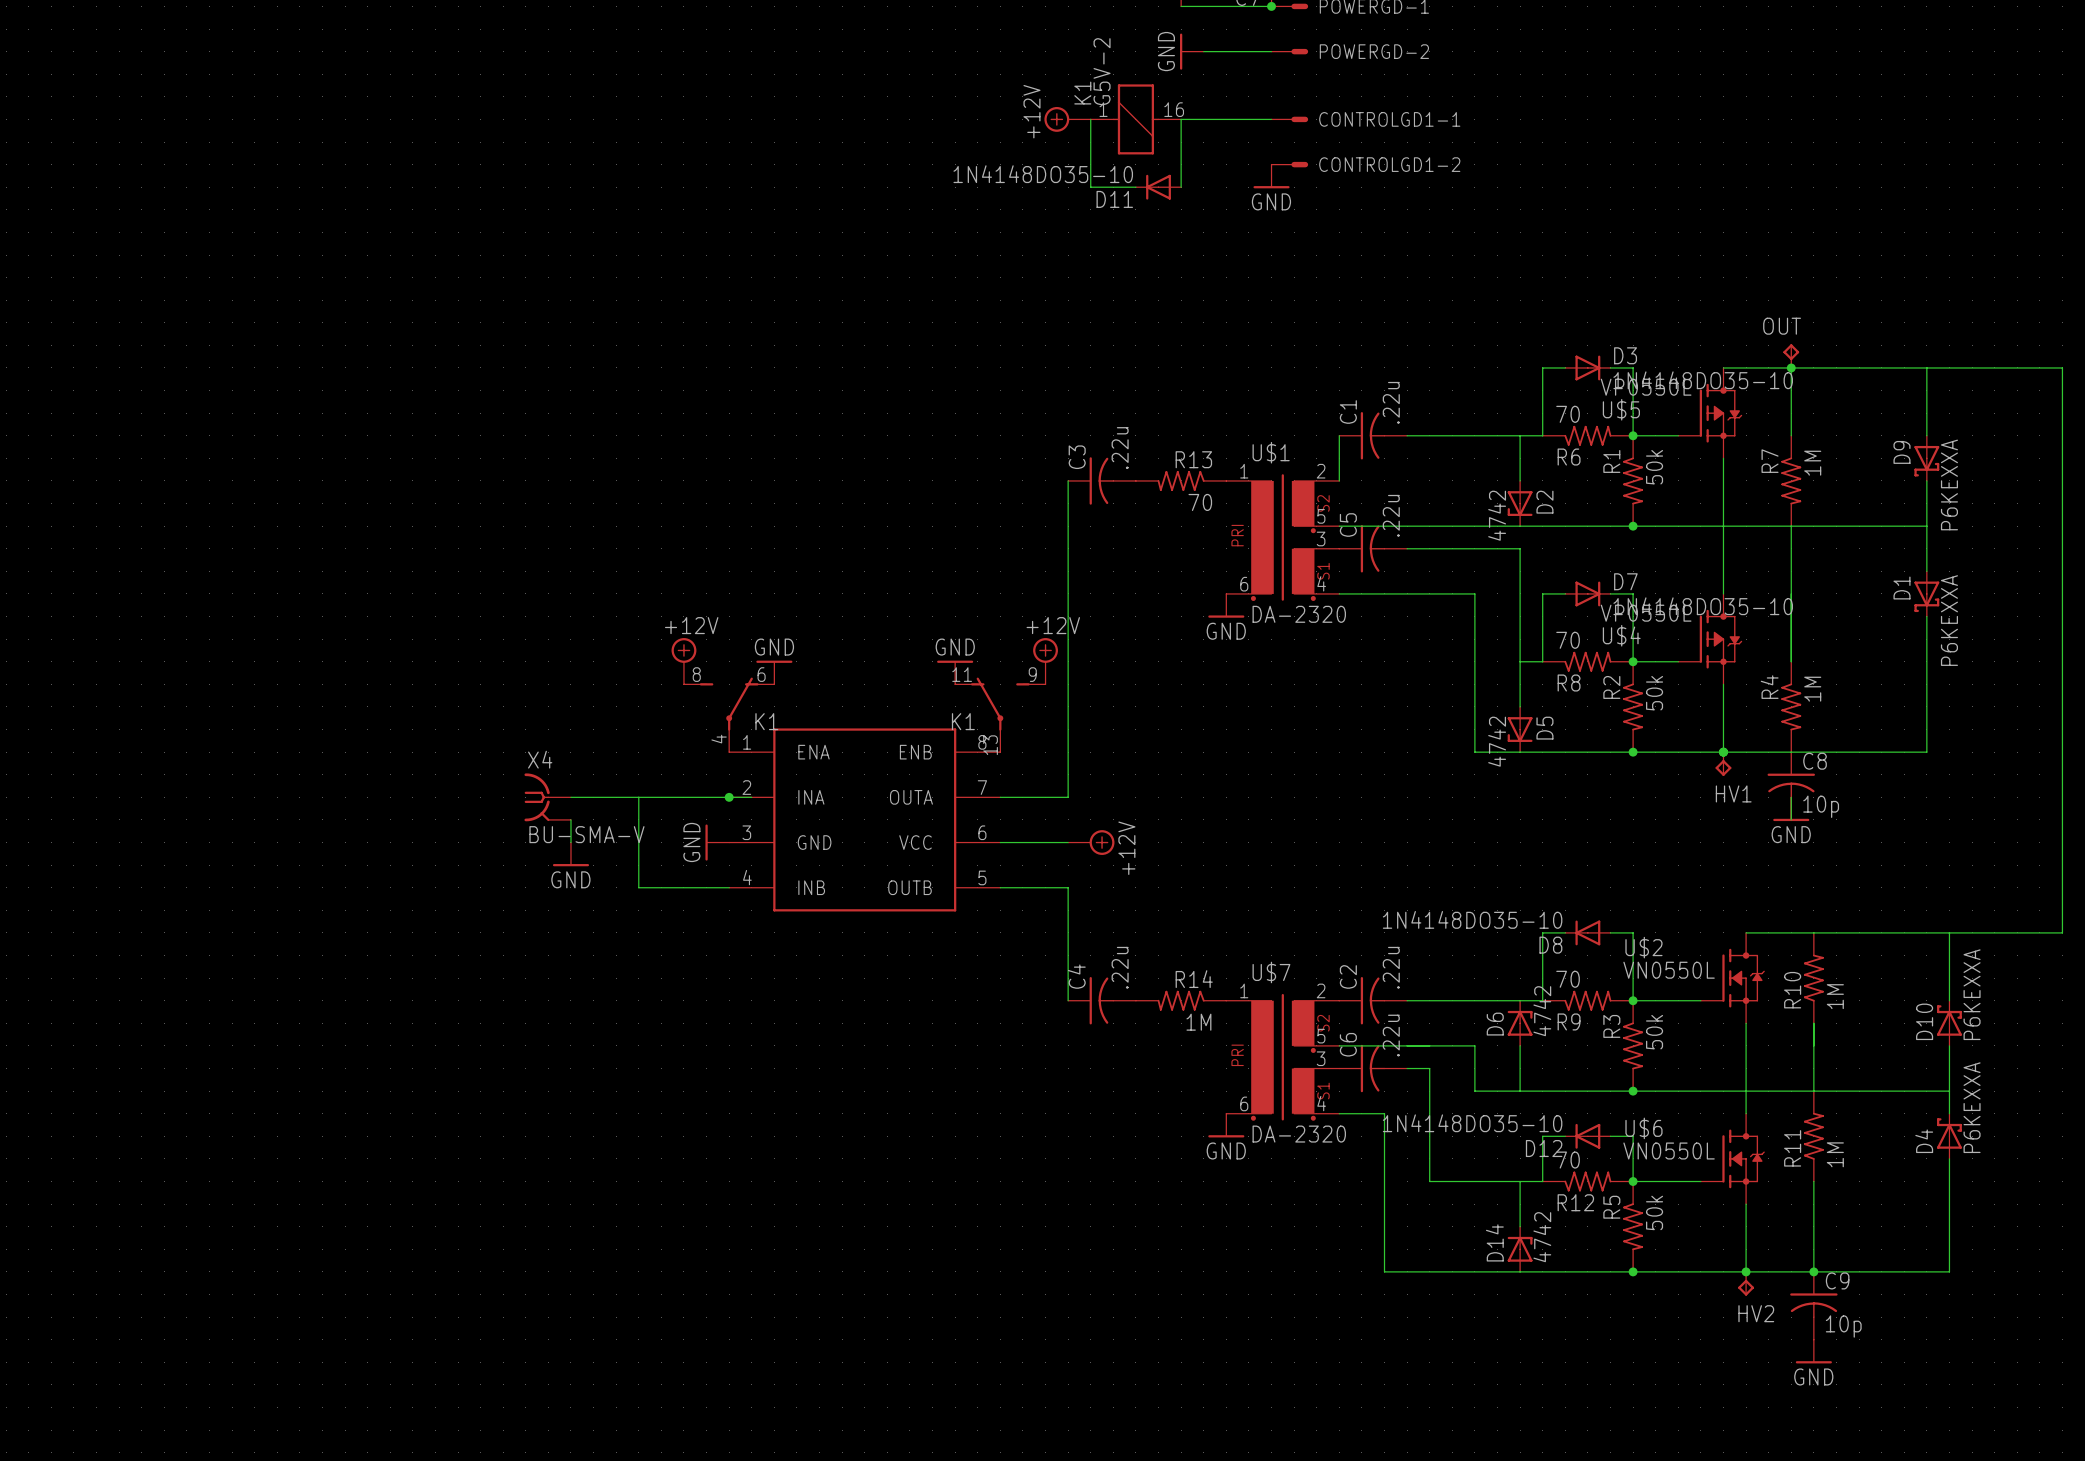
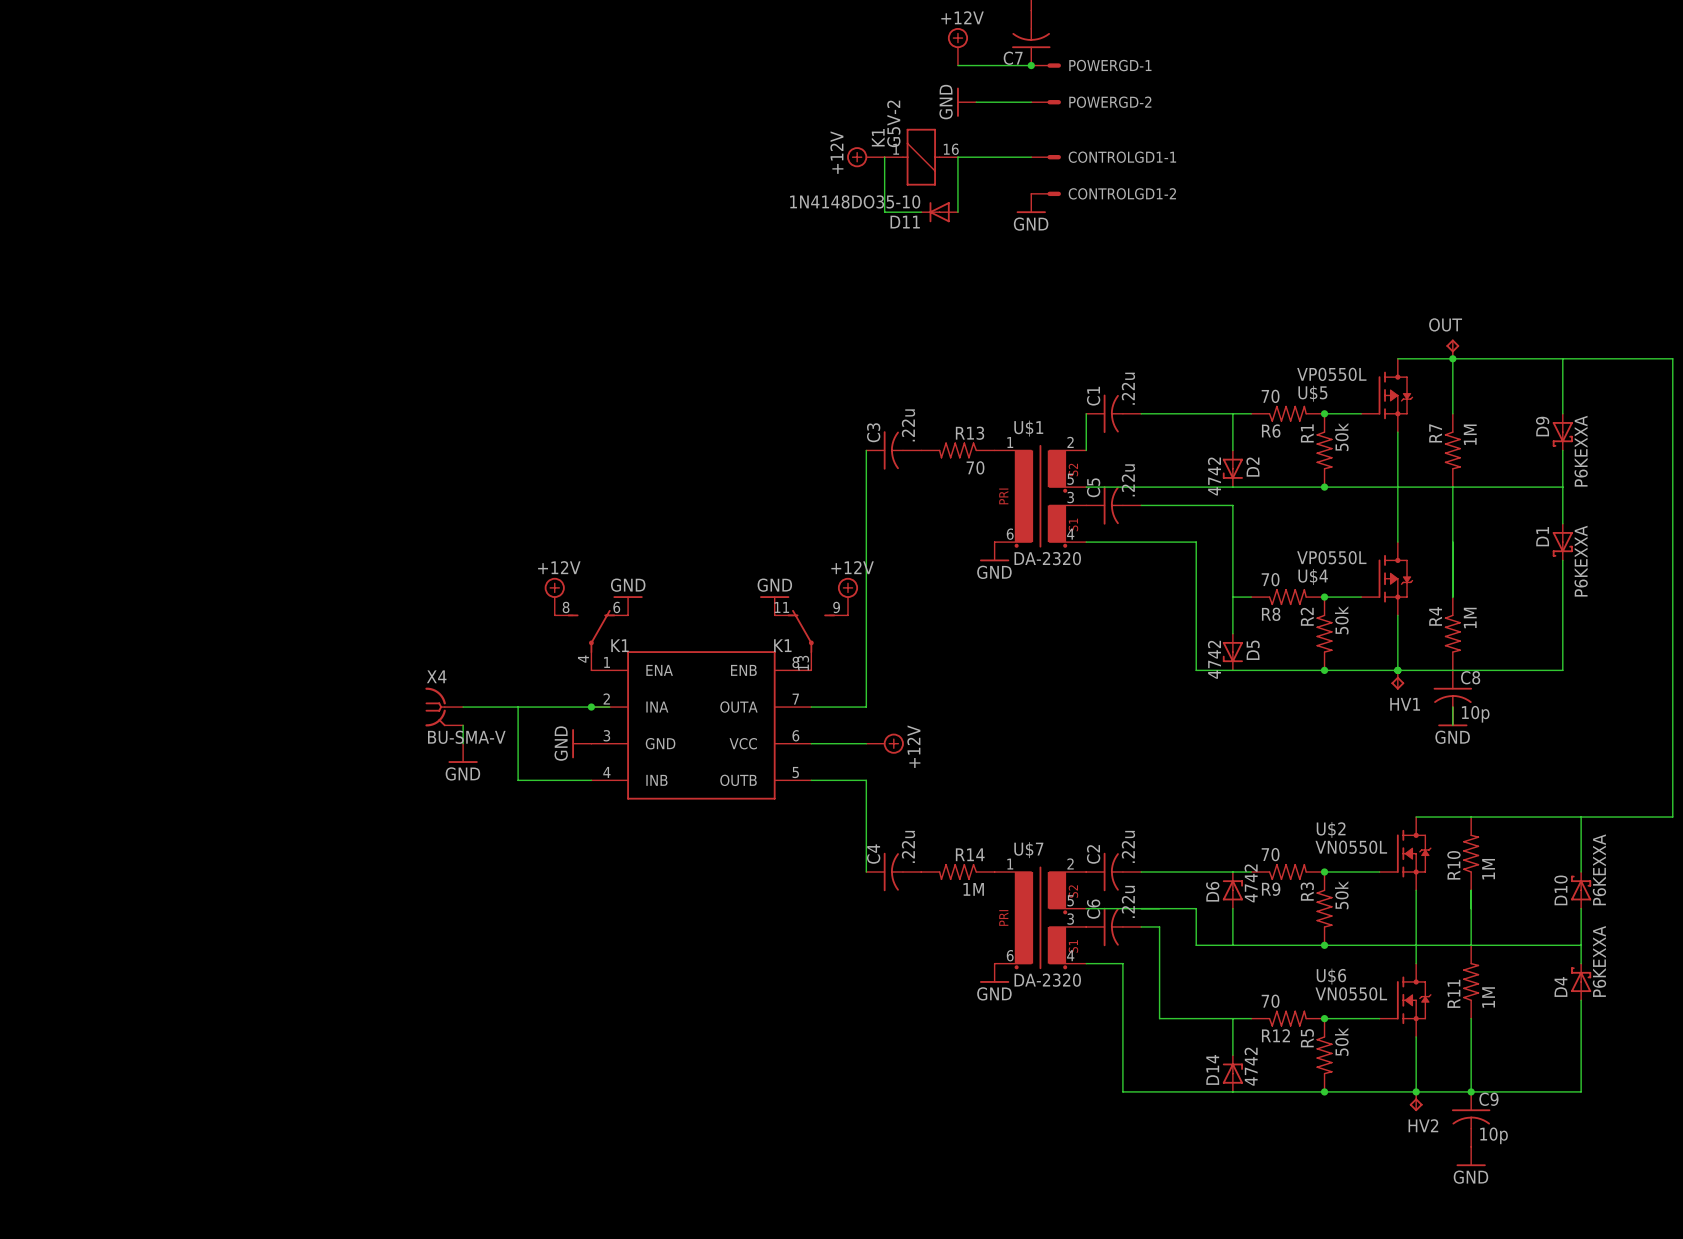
wire: (1565, 367) (1542, 367) (1542, 435) -> none
D3: 1N4148DO35-10 (1587, 367) -> none
wire: (1610, 367) (1633, 367) (1633, 435) -> none
wire: (1565, 593) (1542, 593) (1542, 661) -> none
D7: 1N4148DO35-10 (1587, 593) -> none
wire: (1610, 593) (1633, 593) (1633, 661) -> none
wire: (1565, 932) (1542, 932) (1542, 1000) -> none
D8: 1N4148DO35-10 (1587, 932) -> none
wire: (1610, 932) (1633, 932) (1633, 1000) -> none
wire: (1565, 1136) (1542, 1136) (1542, 1181) -> none
D12: 1N4148DO35-10 (1587, 1136) -> none
wire: (1610, 1136) (1633, 1136) (1633, 1181) -> none

